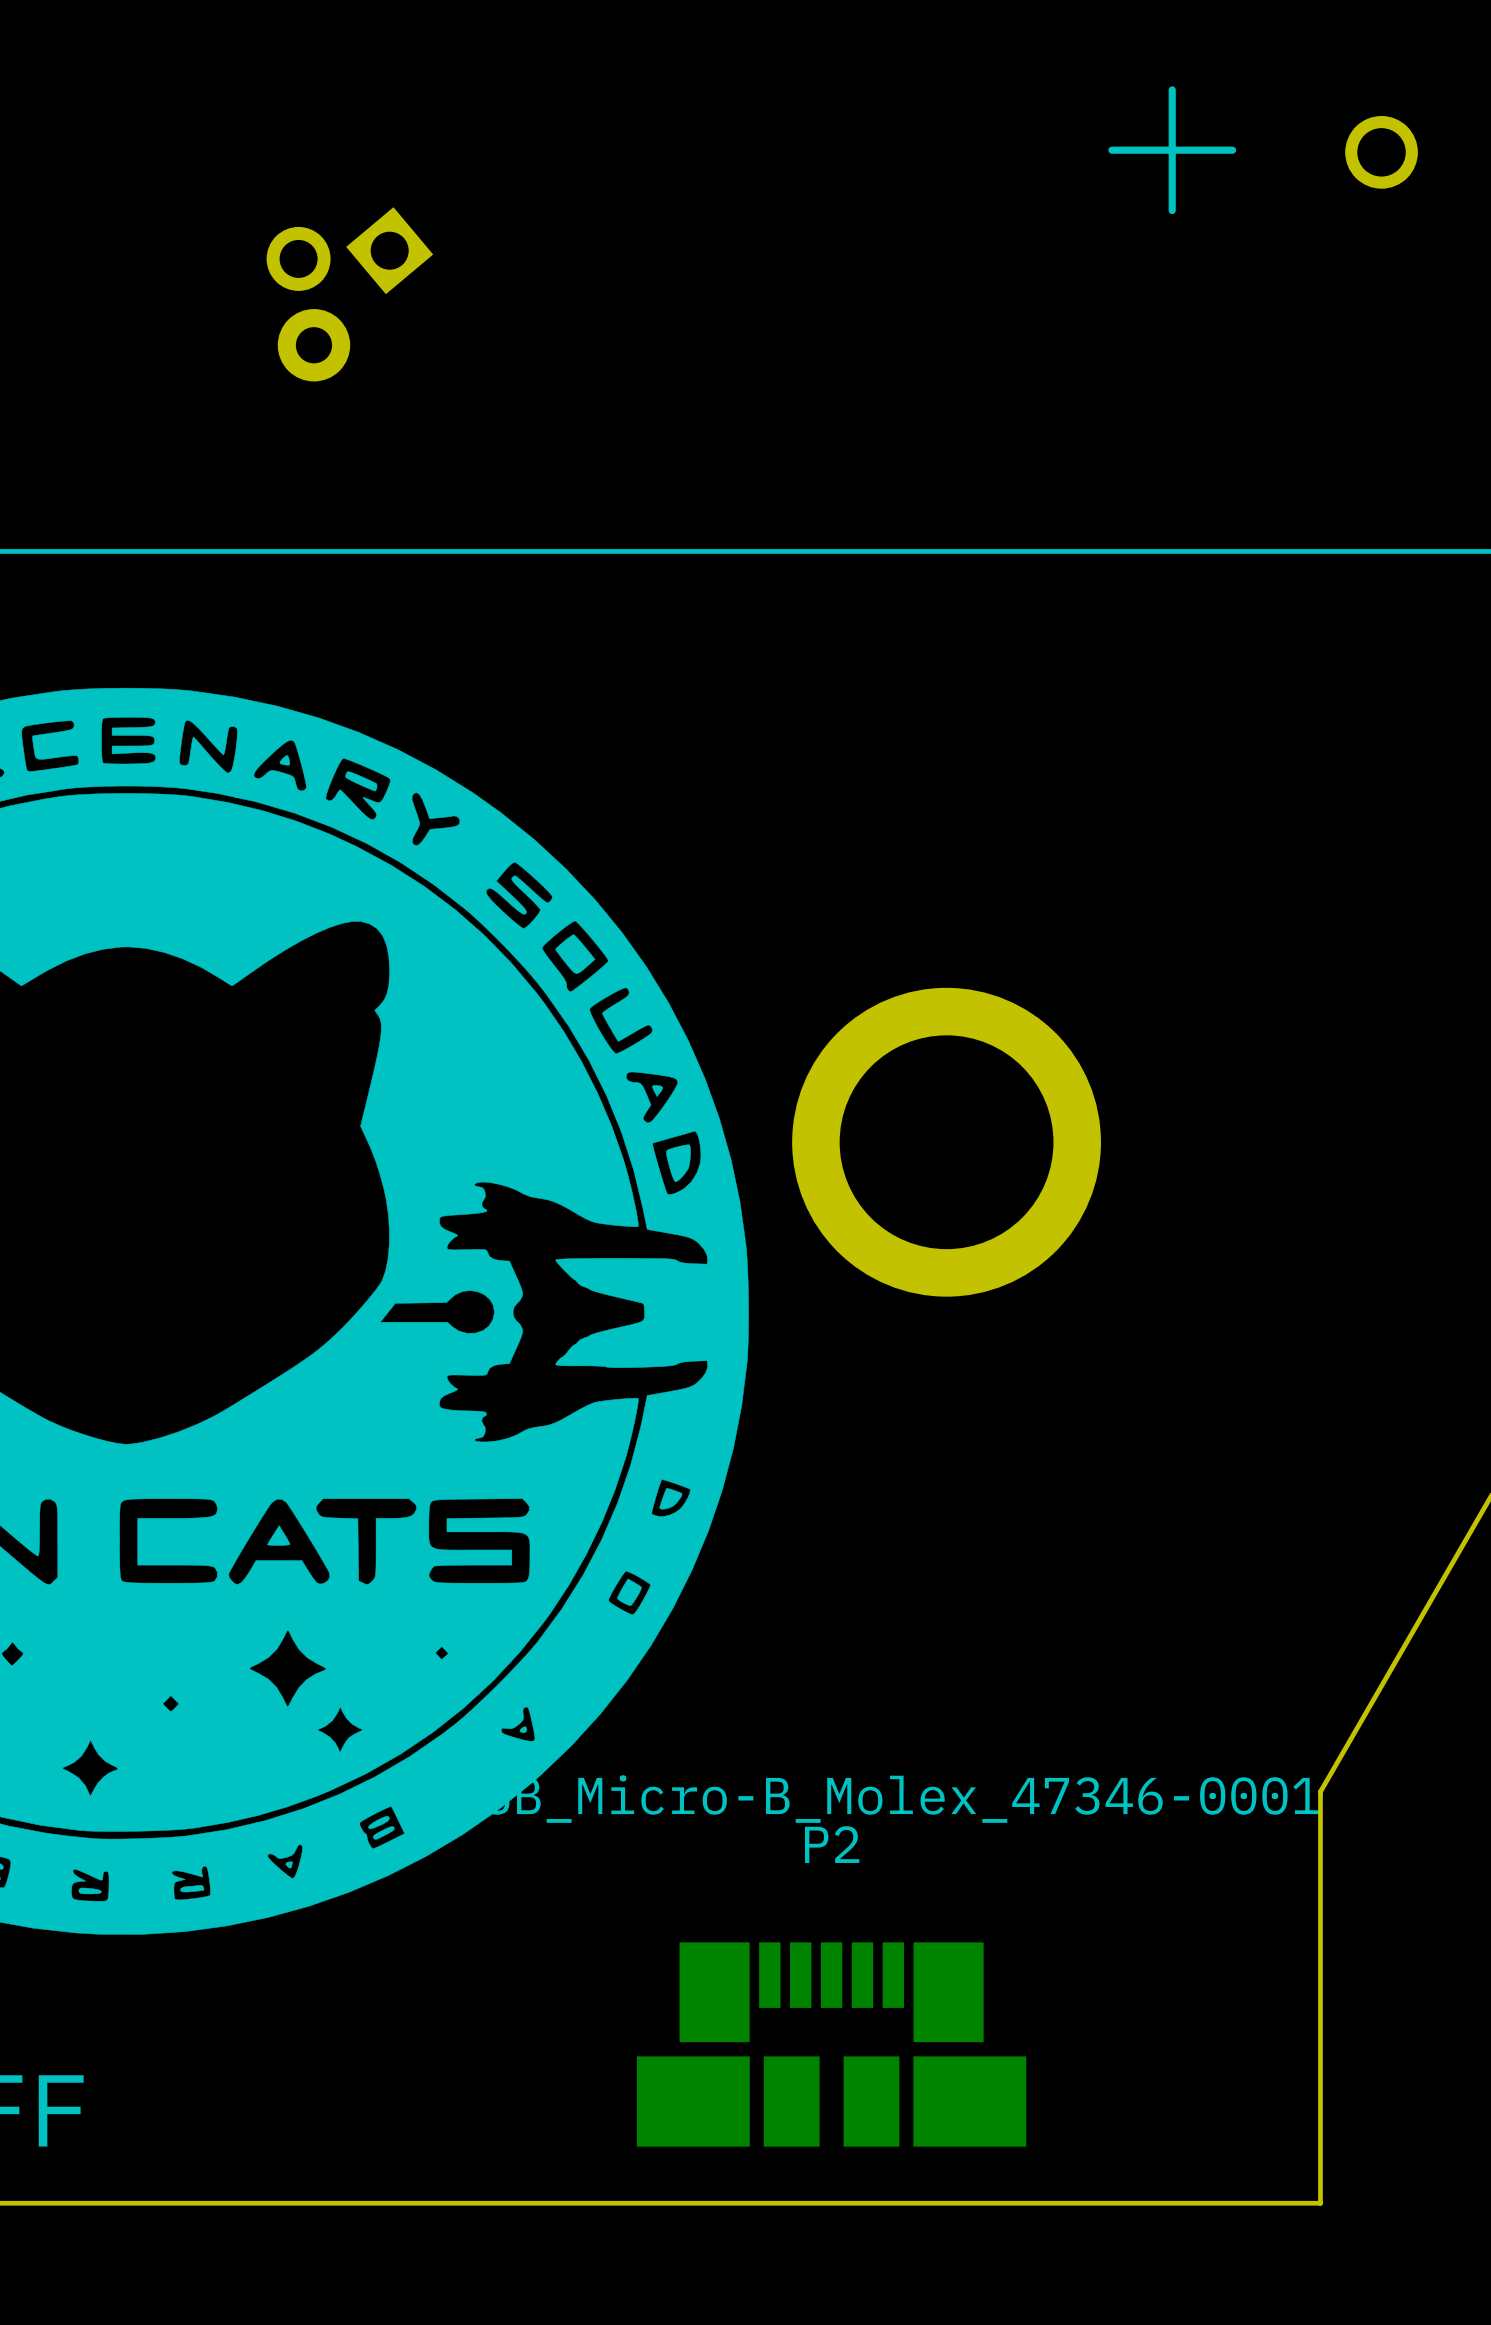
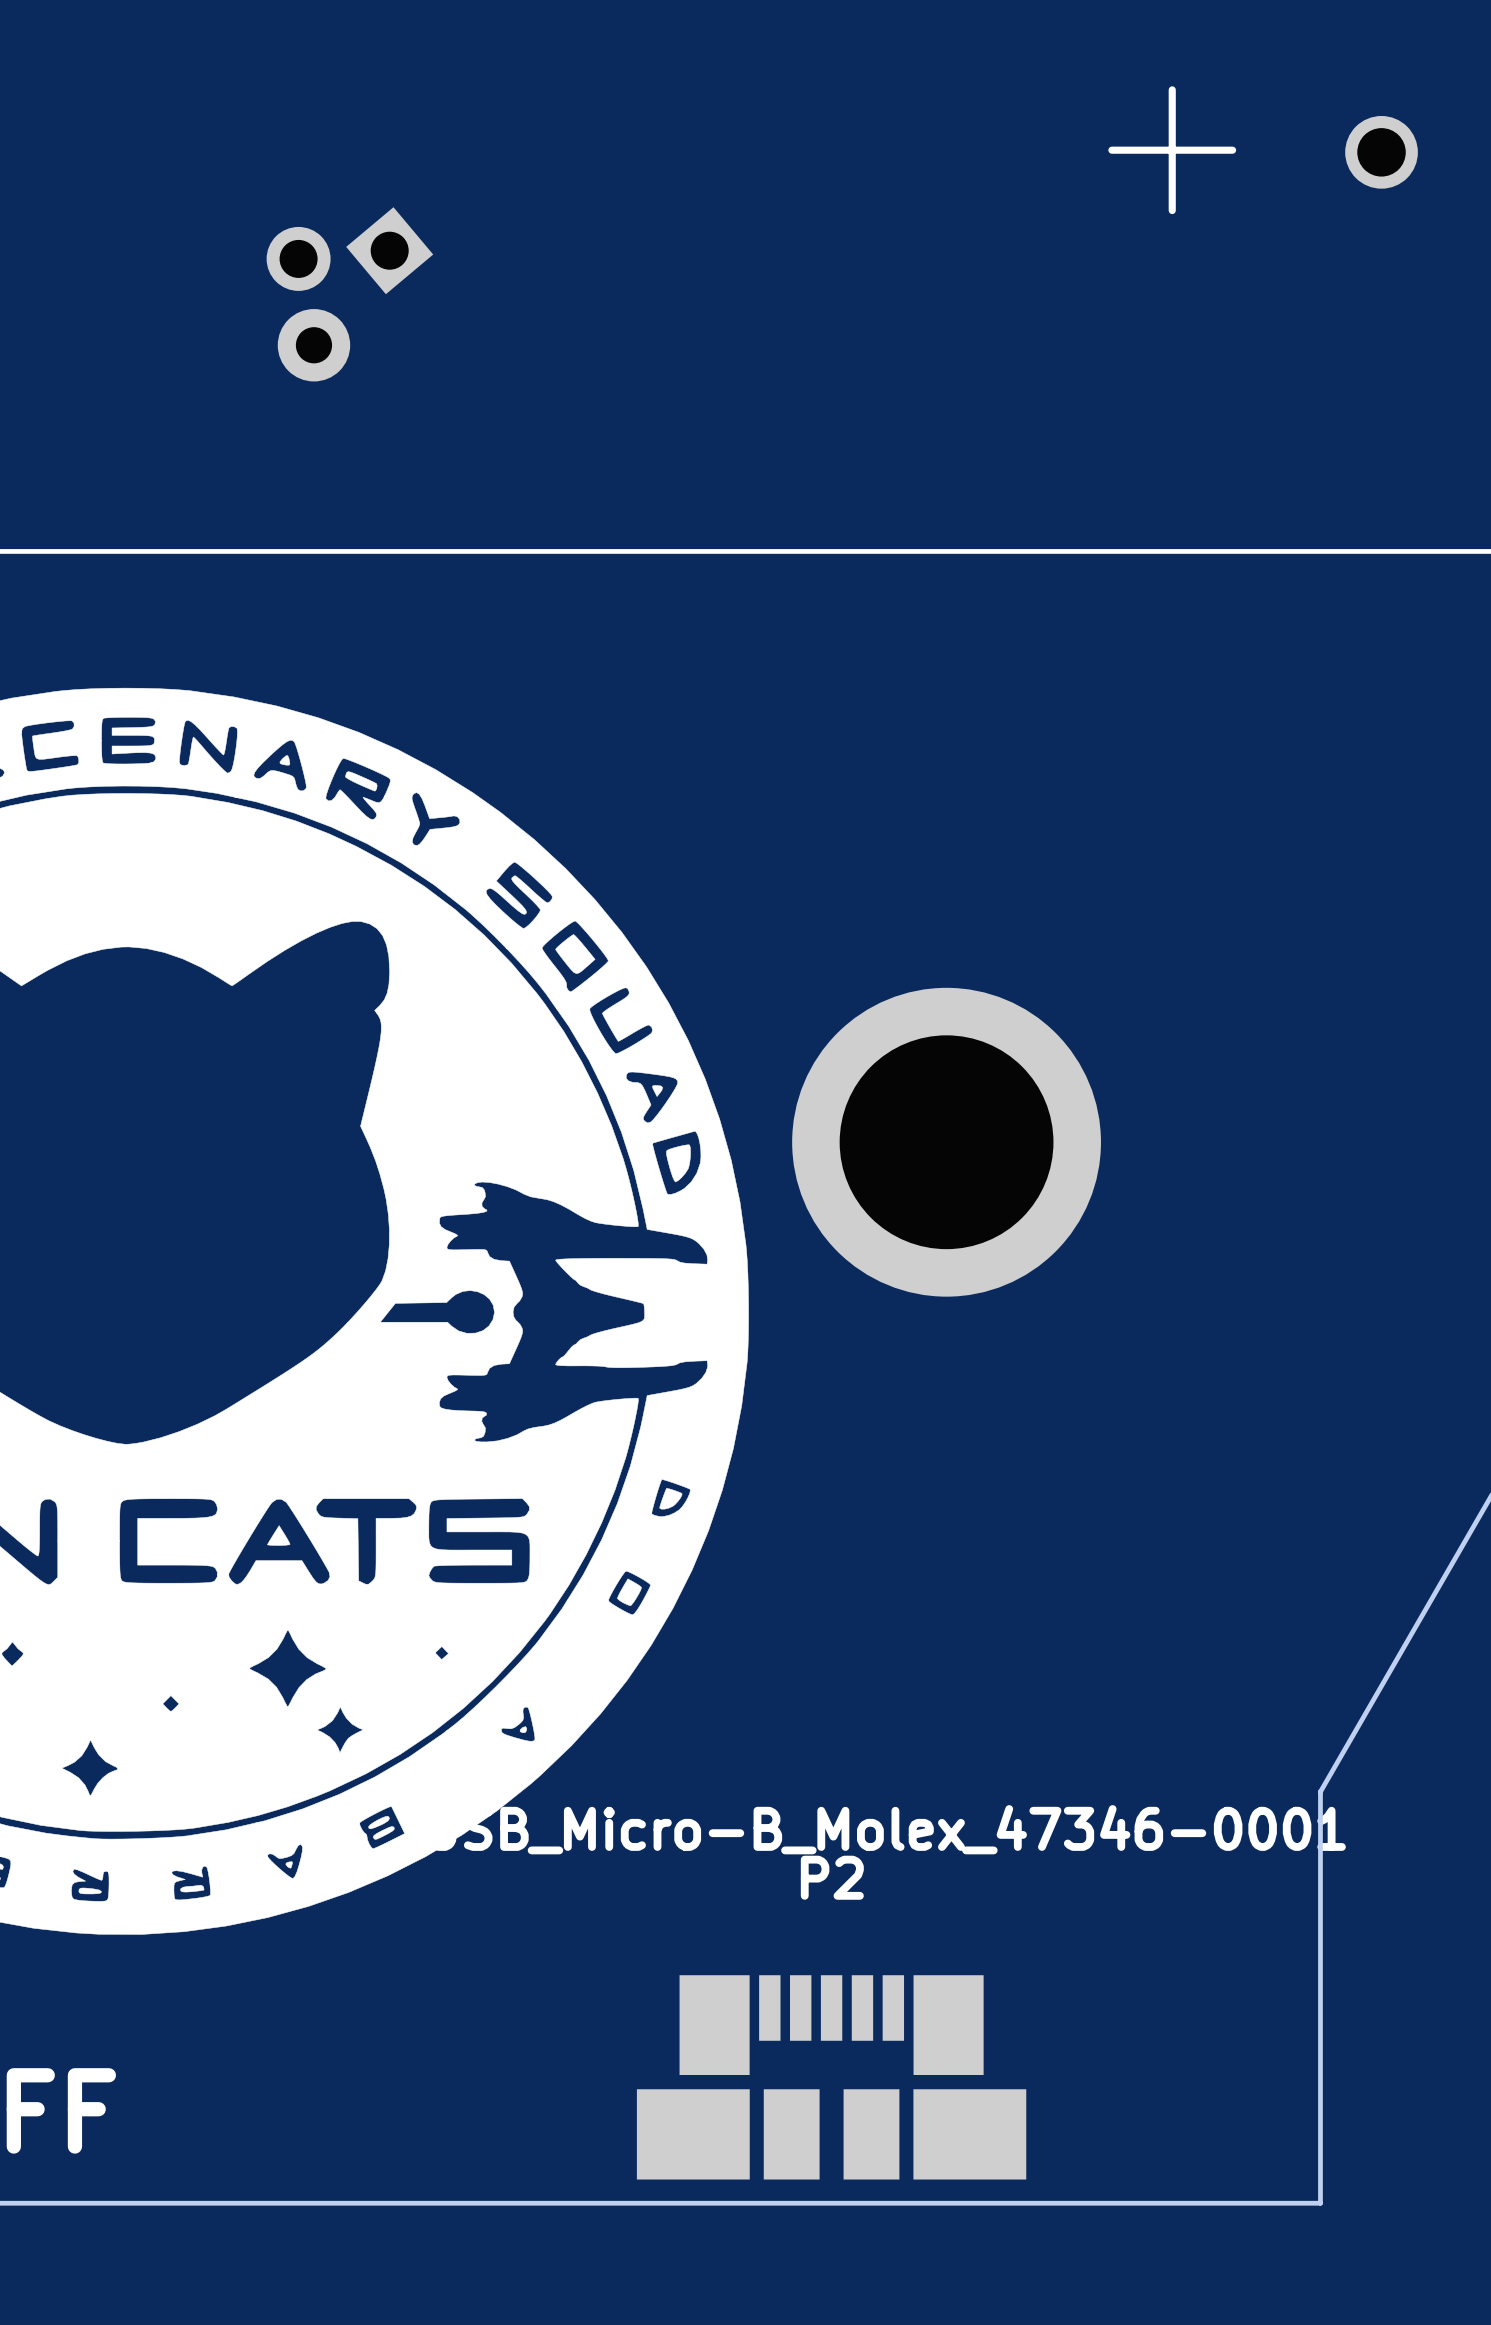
P2 position: (831, 2044) -> (831, 2077)

